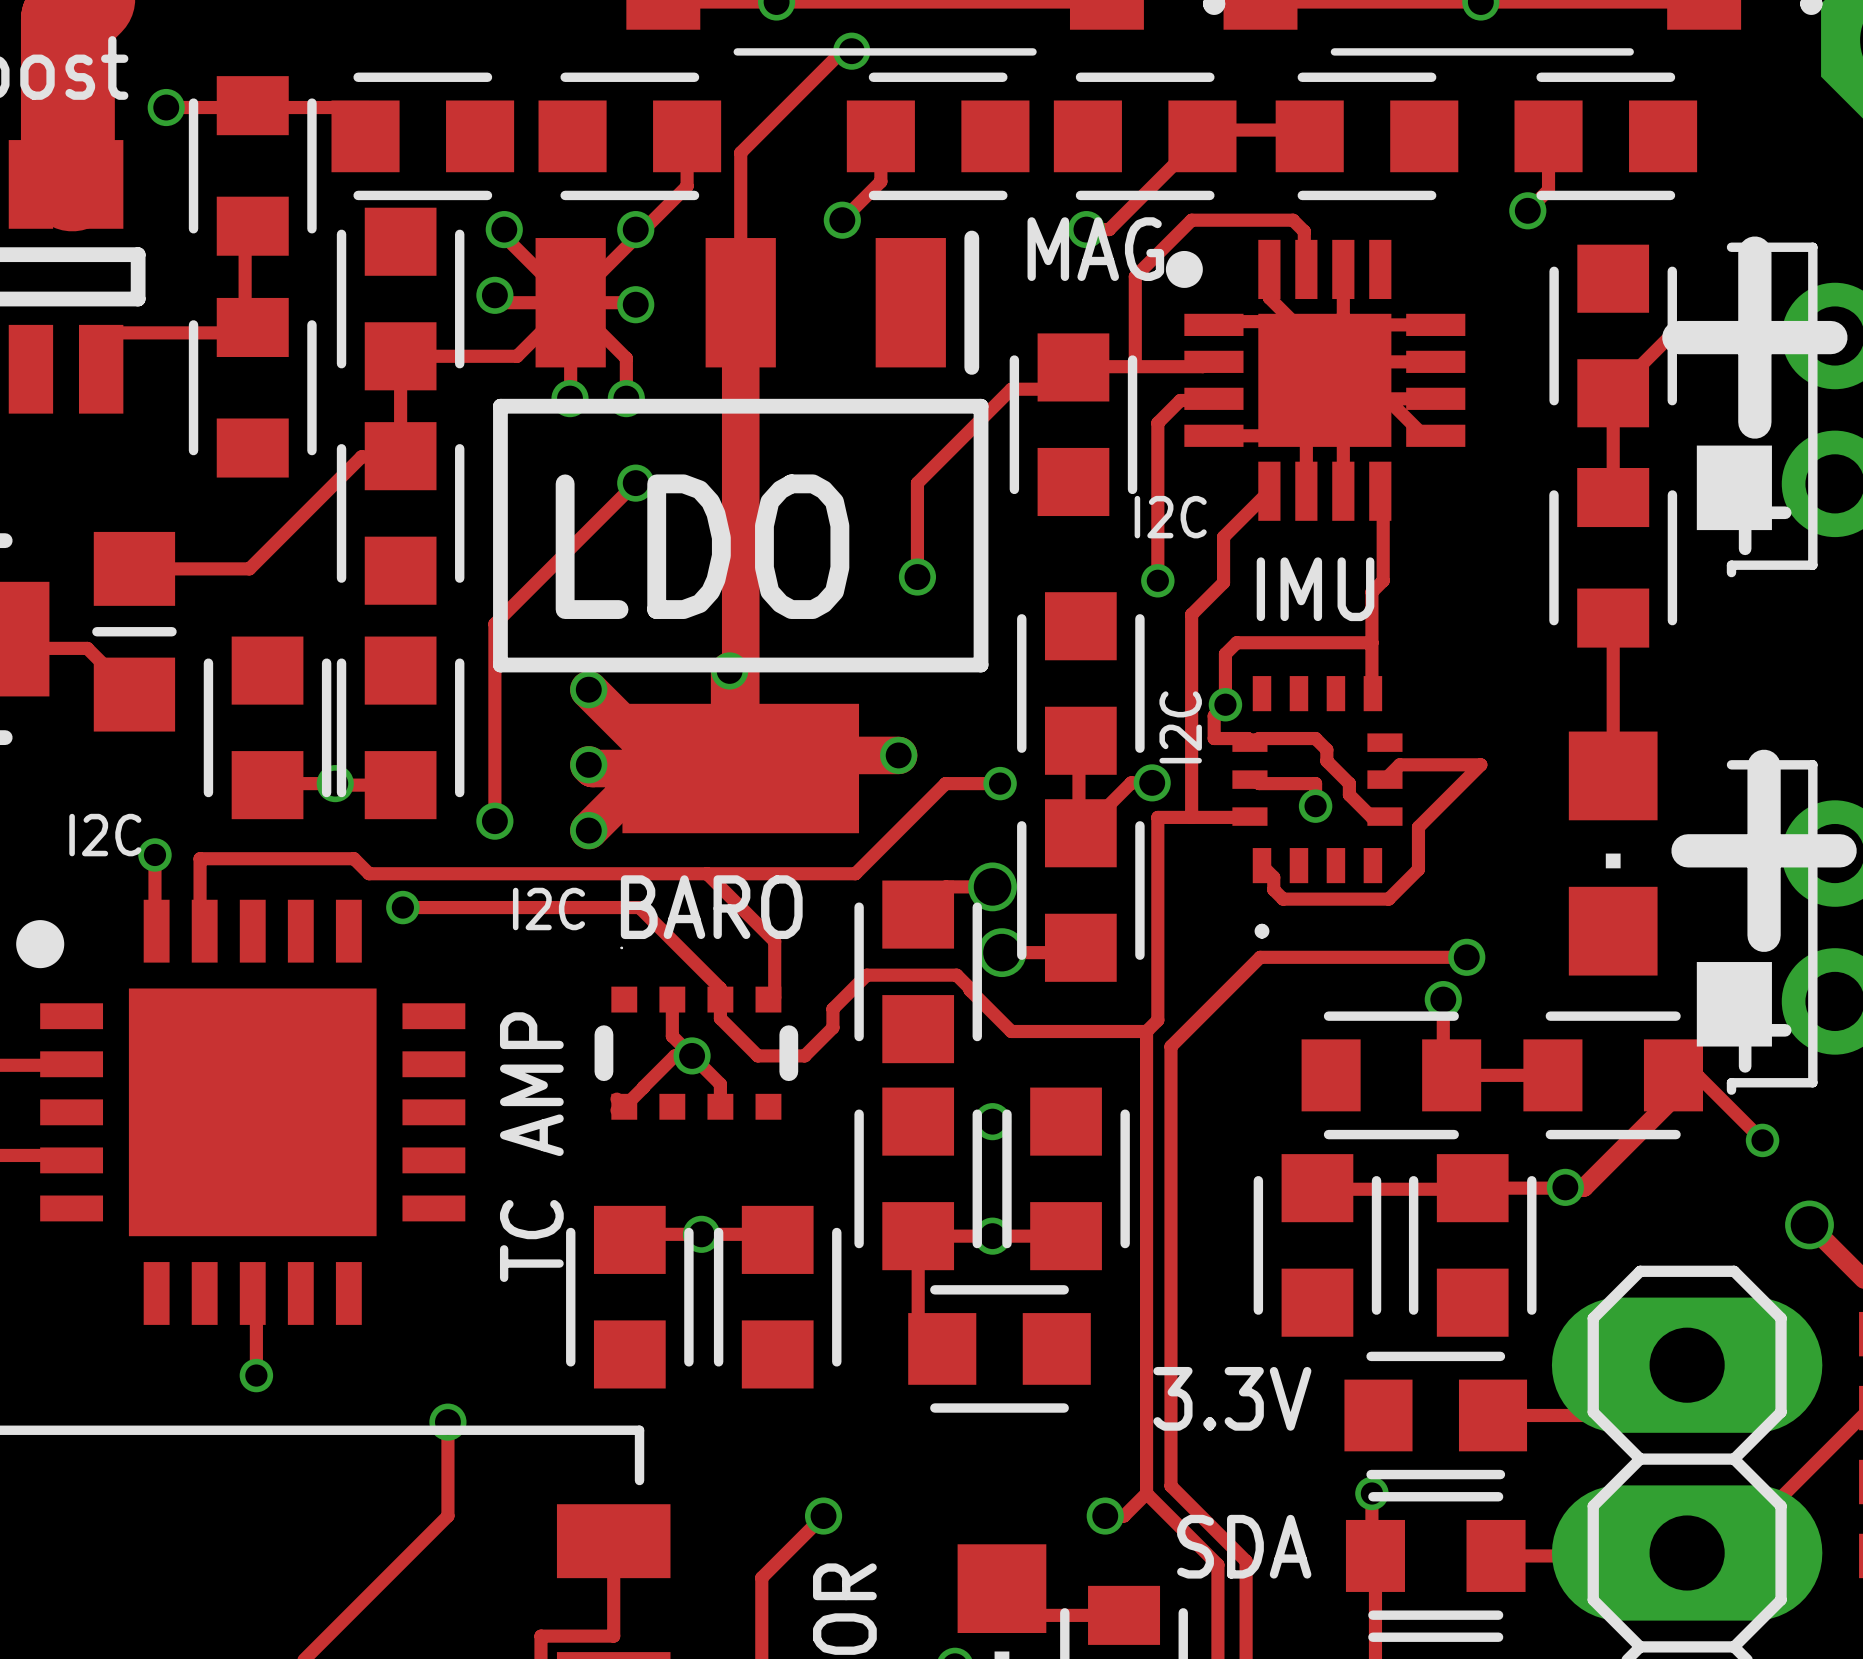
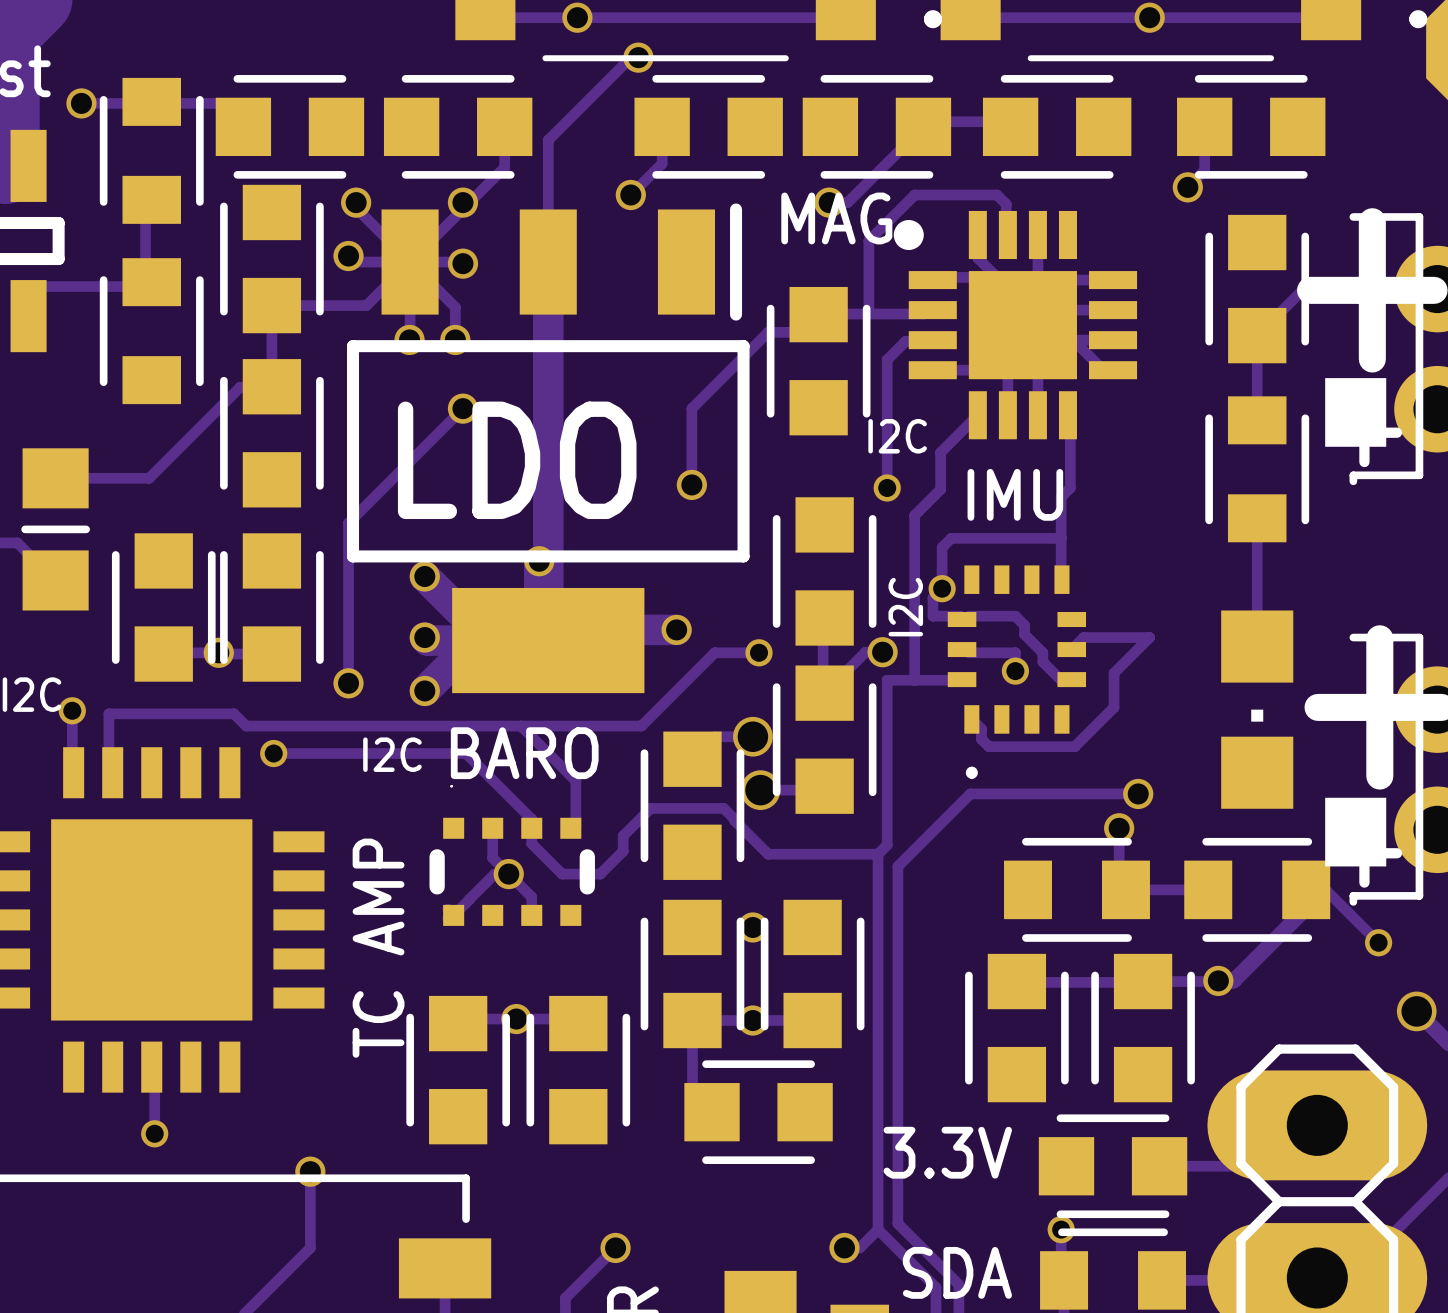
track: (1436, 808) (1418, 827) (1418, 869) -> (1114, 673) (1114, 707) (1099, 722)

